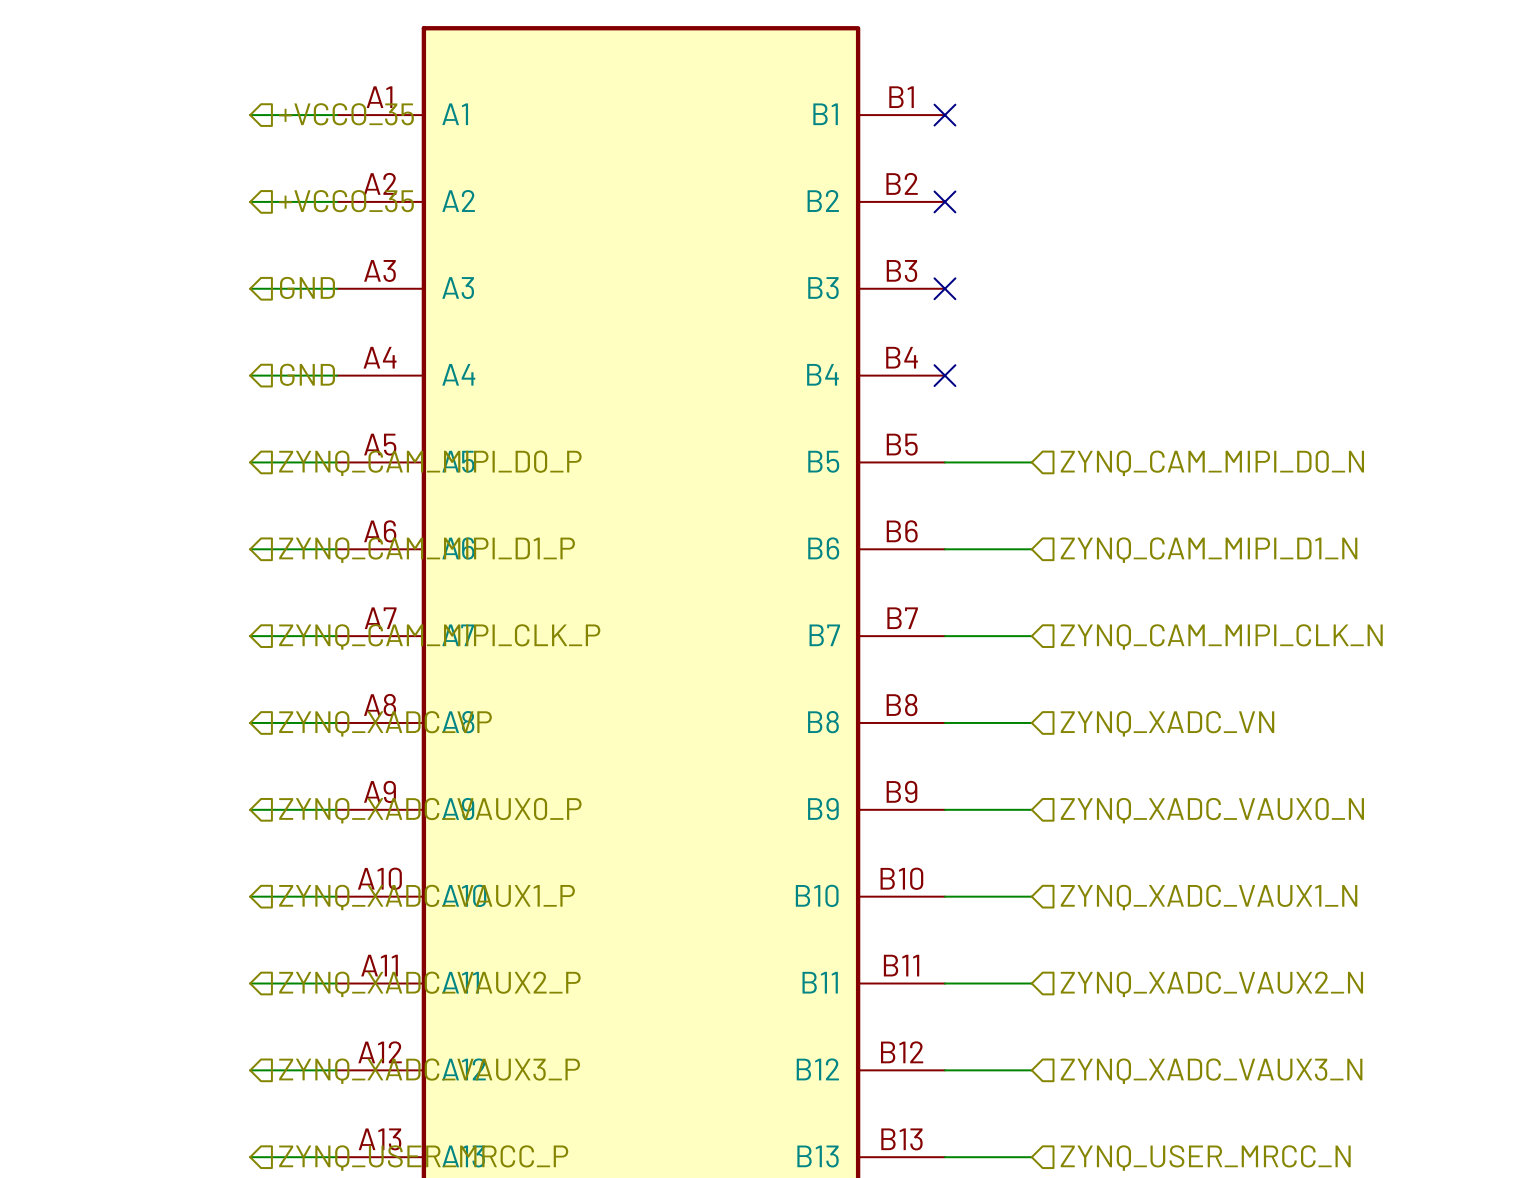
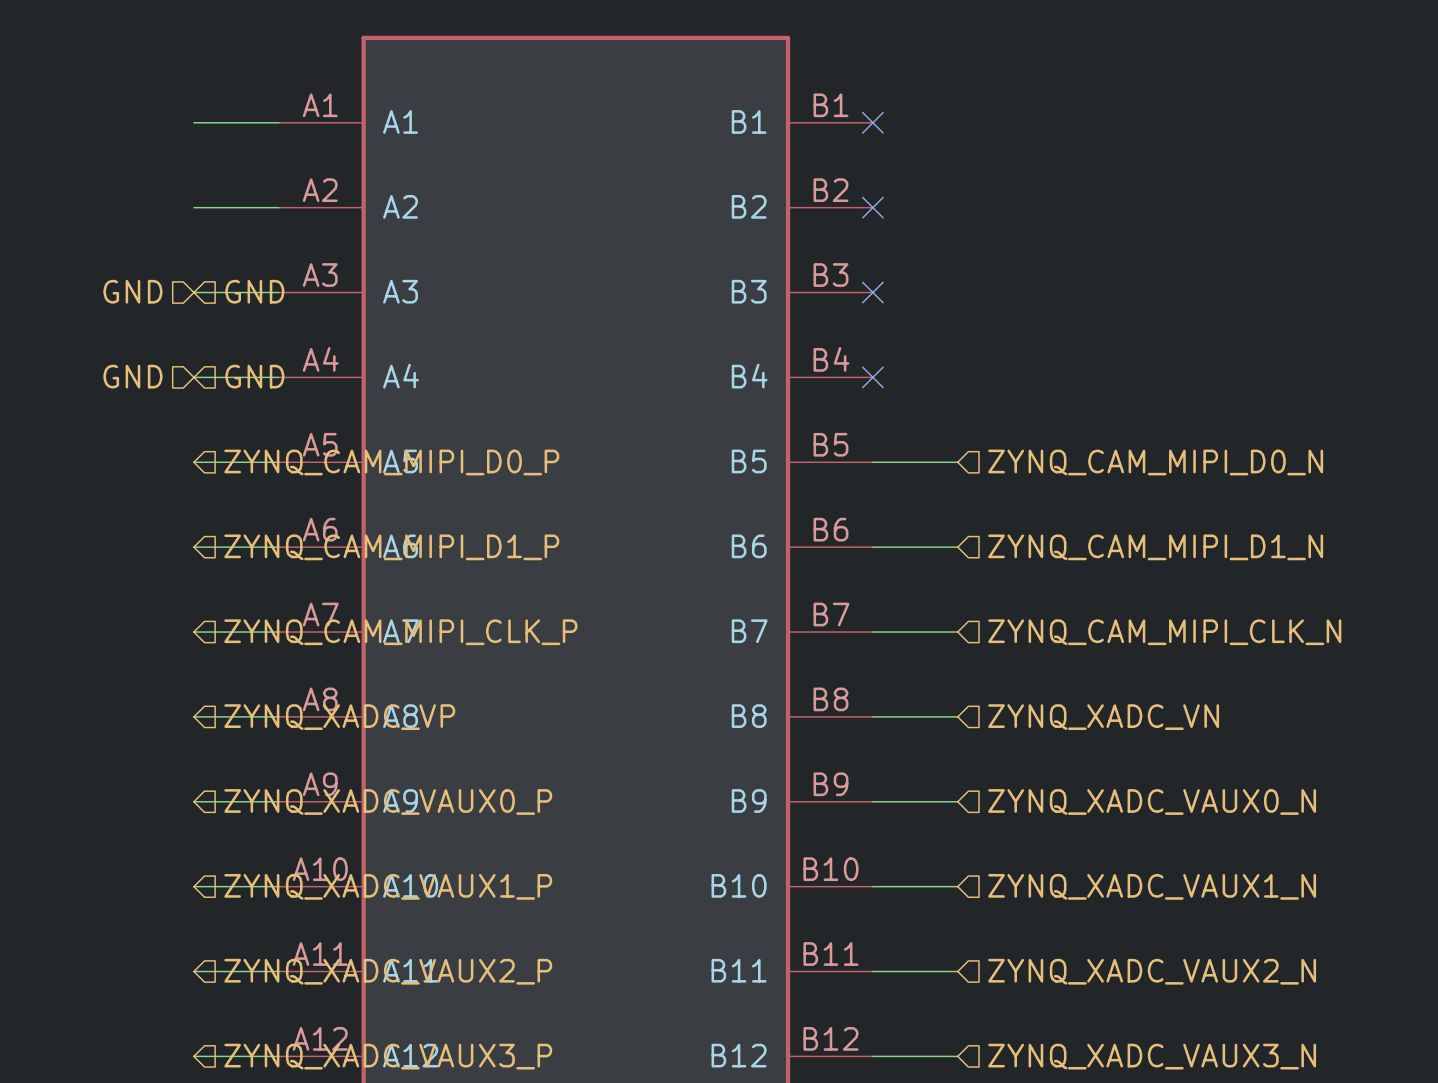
hierarchical label: +VCCO_35 (346, 114) -> none
hierarchical label: +VCCO_35 (346, 201) -> none
hierarchical label: none -> GND (132, 291)
hierarchical label: none -> GND (132, 376)

